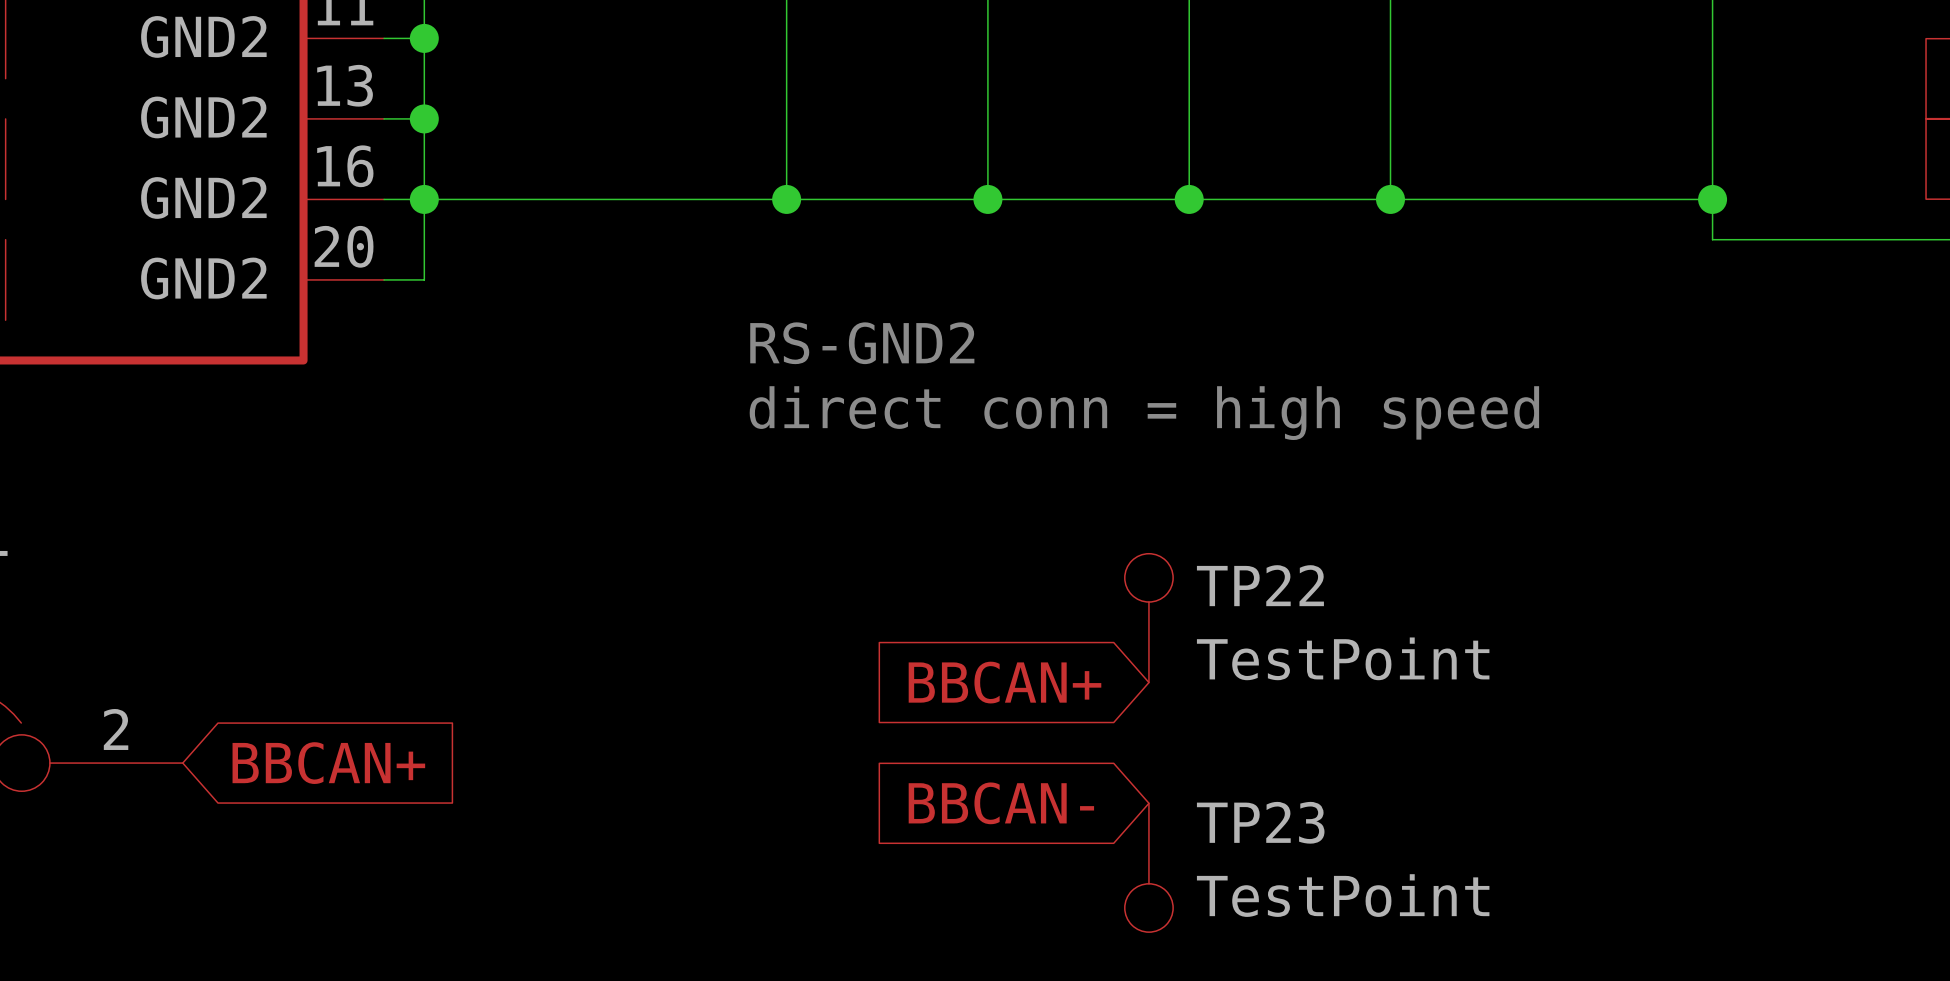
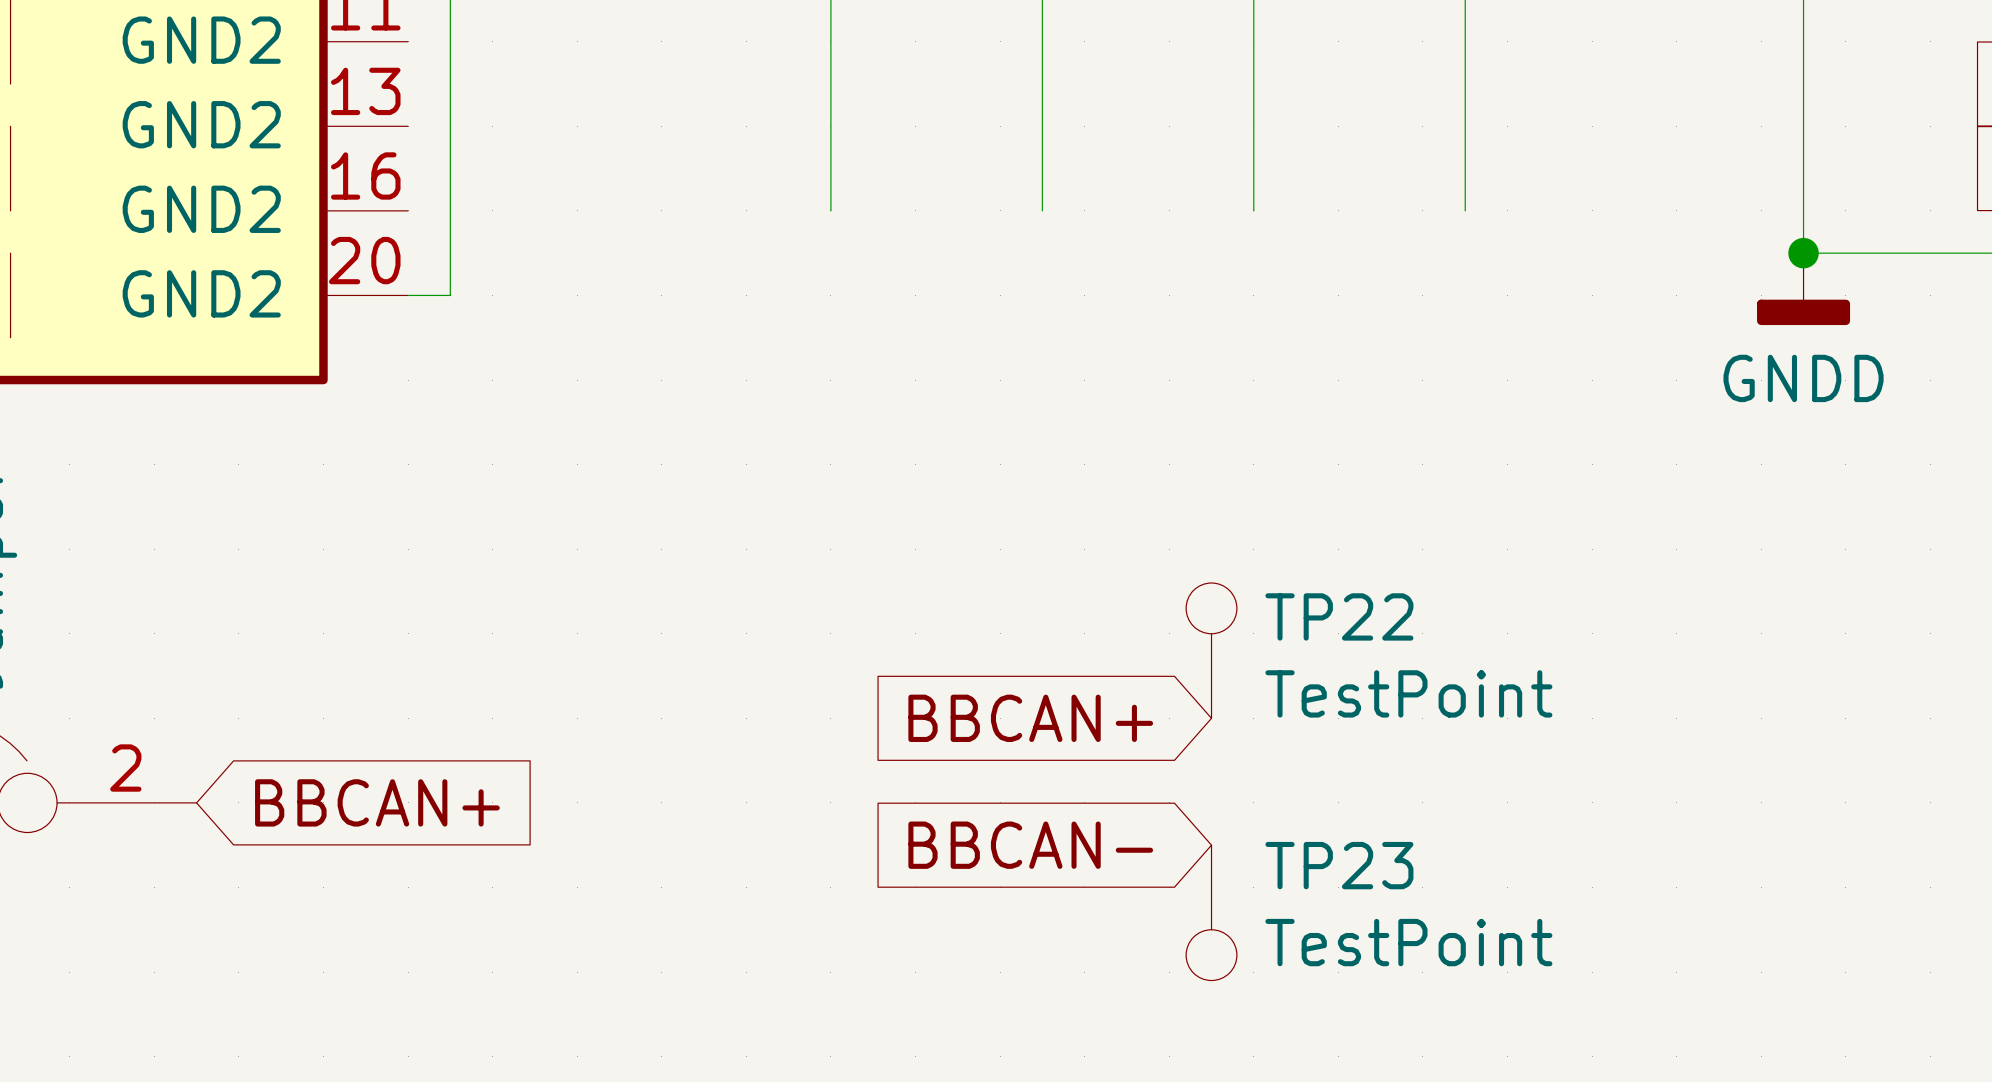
wire: (384, 38) (424, 38) -> none
junction: (424, 38) -> none
wire: (384, 118) (424, 118) -> none
junction: (424, 118) -> none
wire: (384, 199) (1712, 199) -> none
junction: (424, 199) -> none
junction: (786, 199) -> none
junction: (987, 199) -> none
junction: (1189, 199) -> none
junction: (1390, 199) -> none
junction position: (1712, 199) -> (1803, 253)
power symbol: none -> GNDD (1803, 289)
text: RS-GND2 (862, 343) -> none
text: direct conn = high speed (1144, 413) -> none

